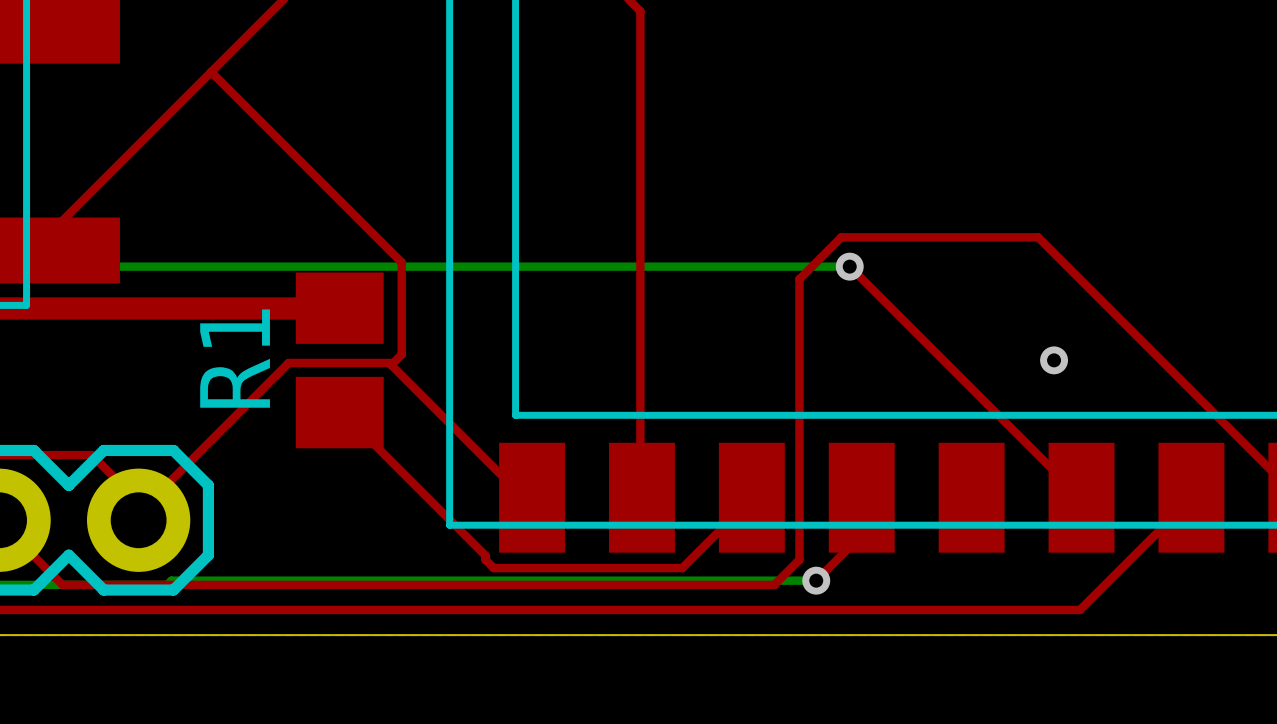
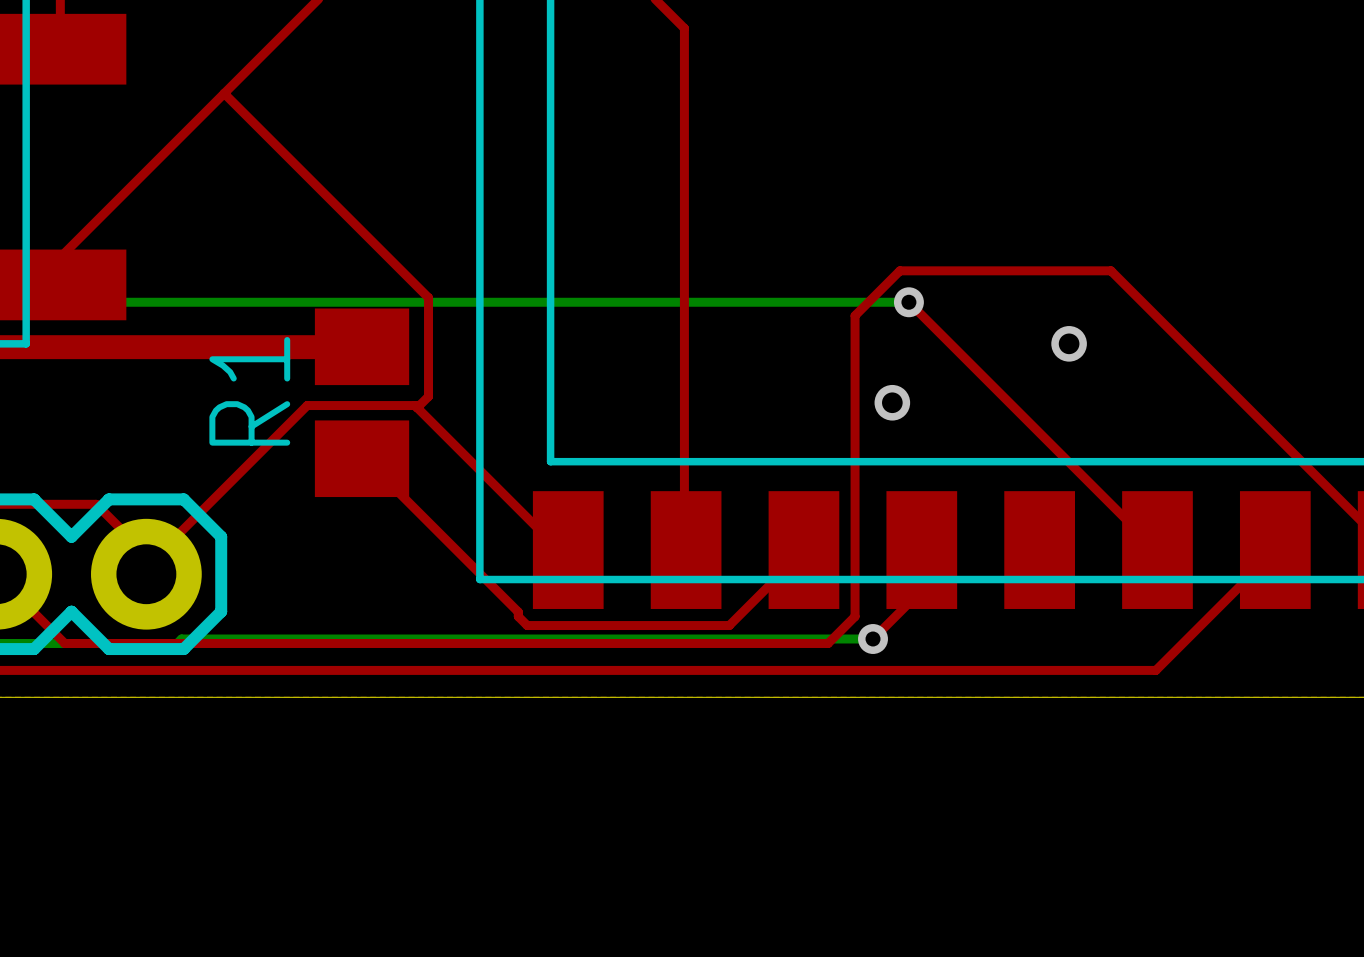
via: none -> (1069, 343)
via: none -> (892, 402)
via: (1054, 360) -> none

